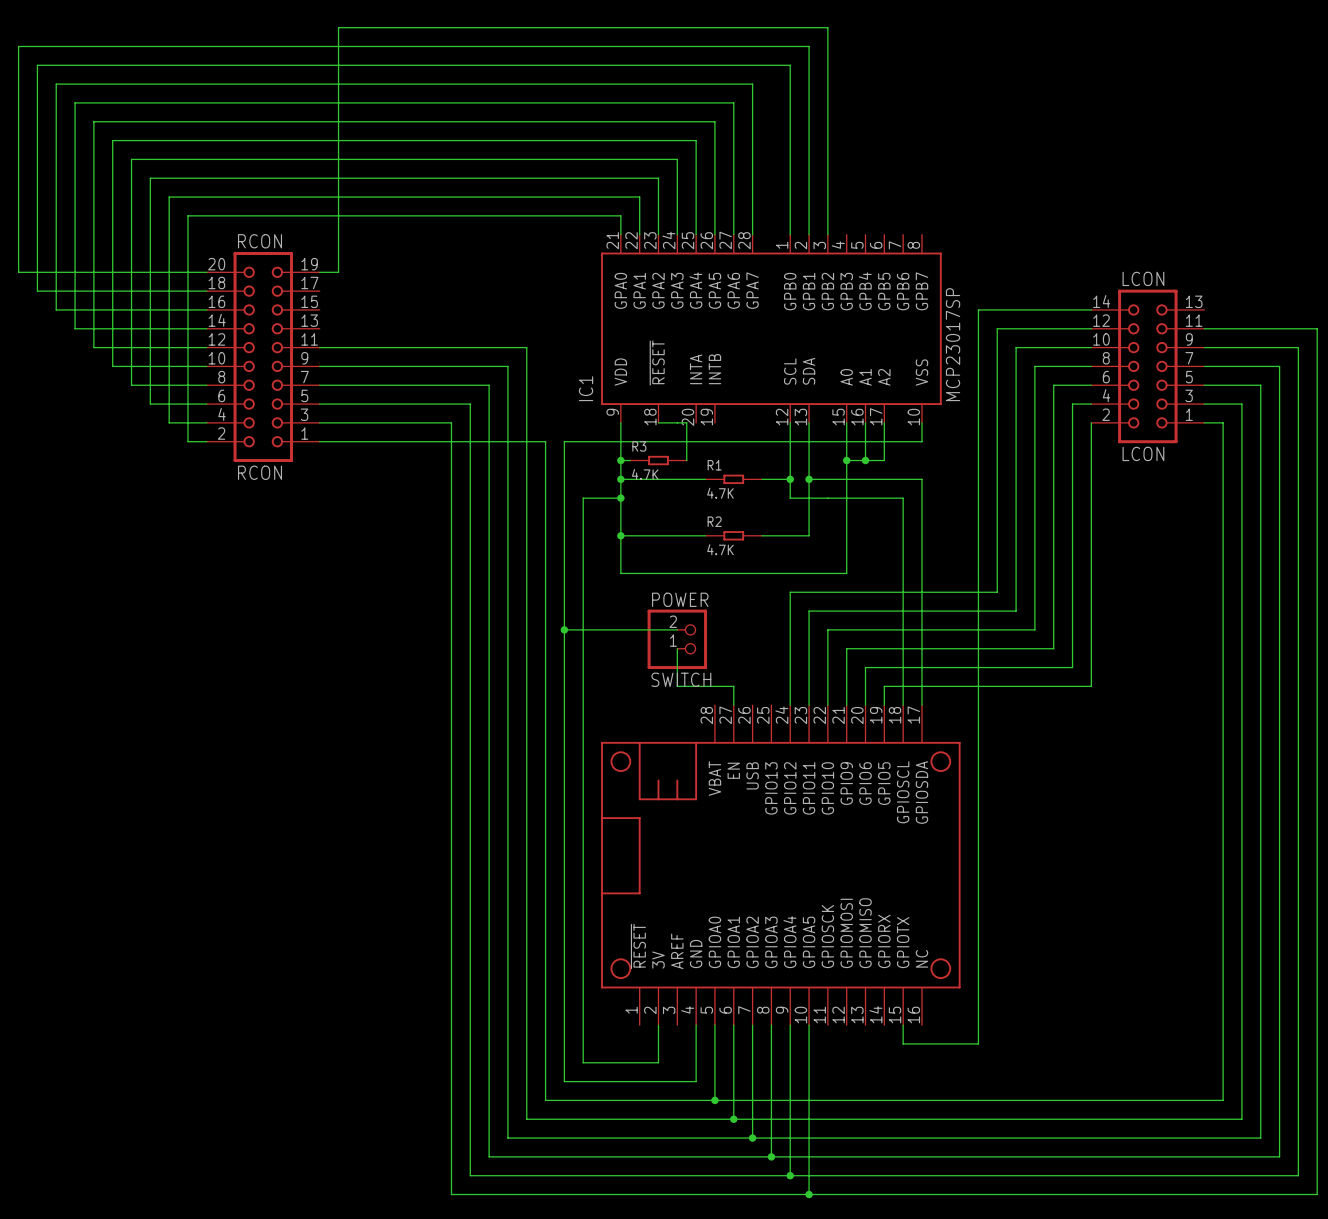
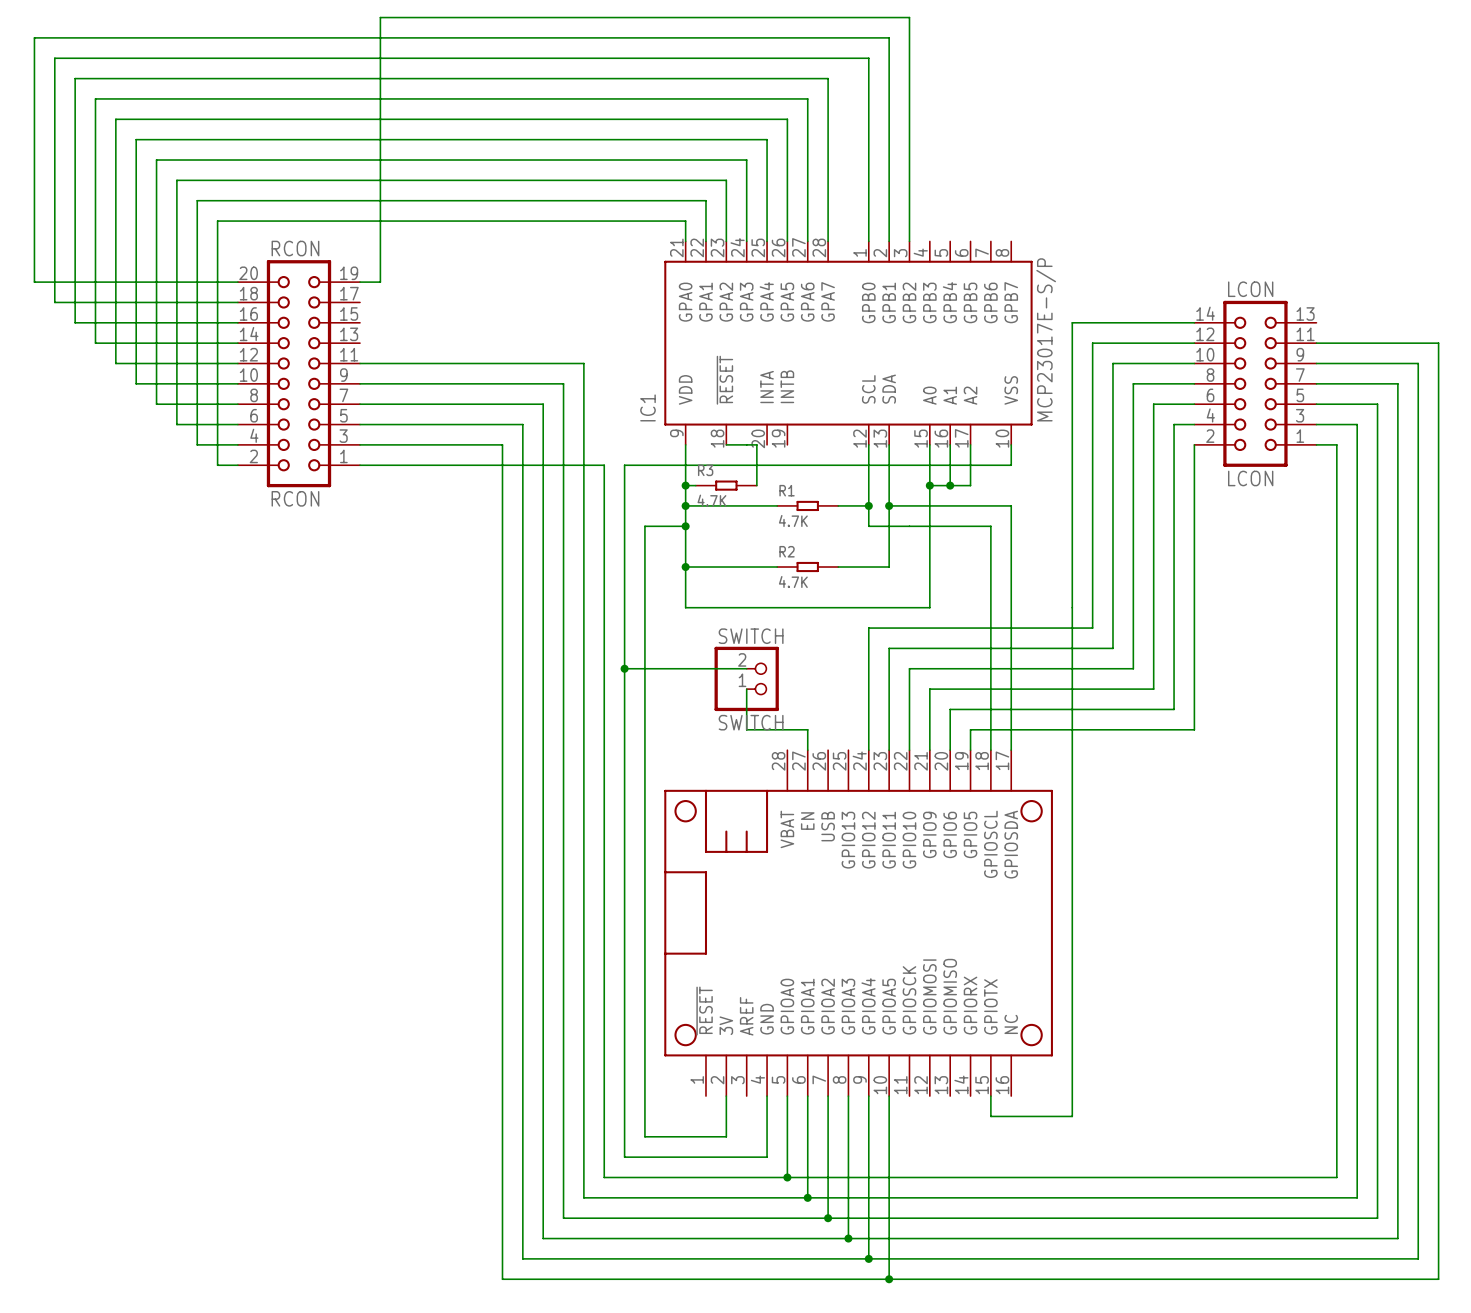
IC1 value: MCP23017SP (953, 344) -> MCP23017E-S/P (1046, 339)
POWER name: POWER (680, 599) -> SWITCH (751, 636)

